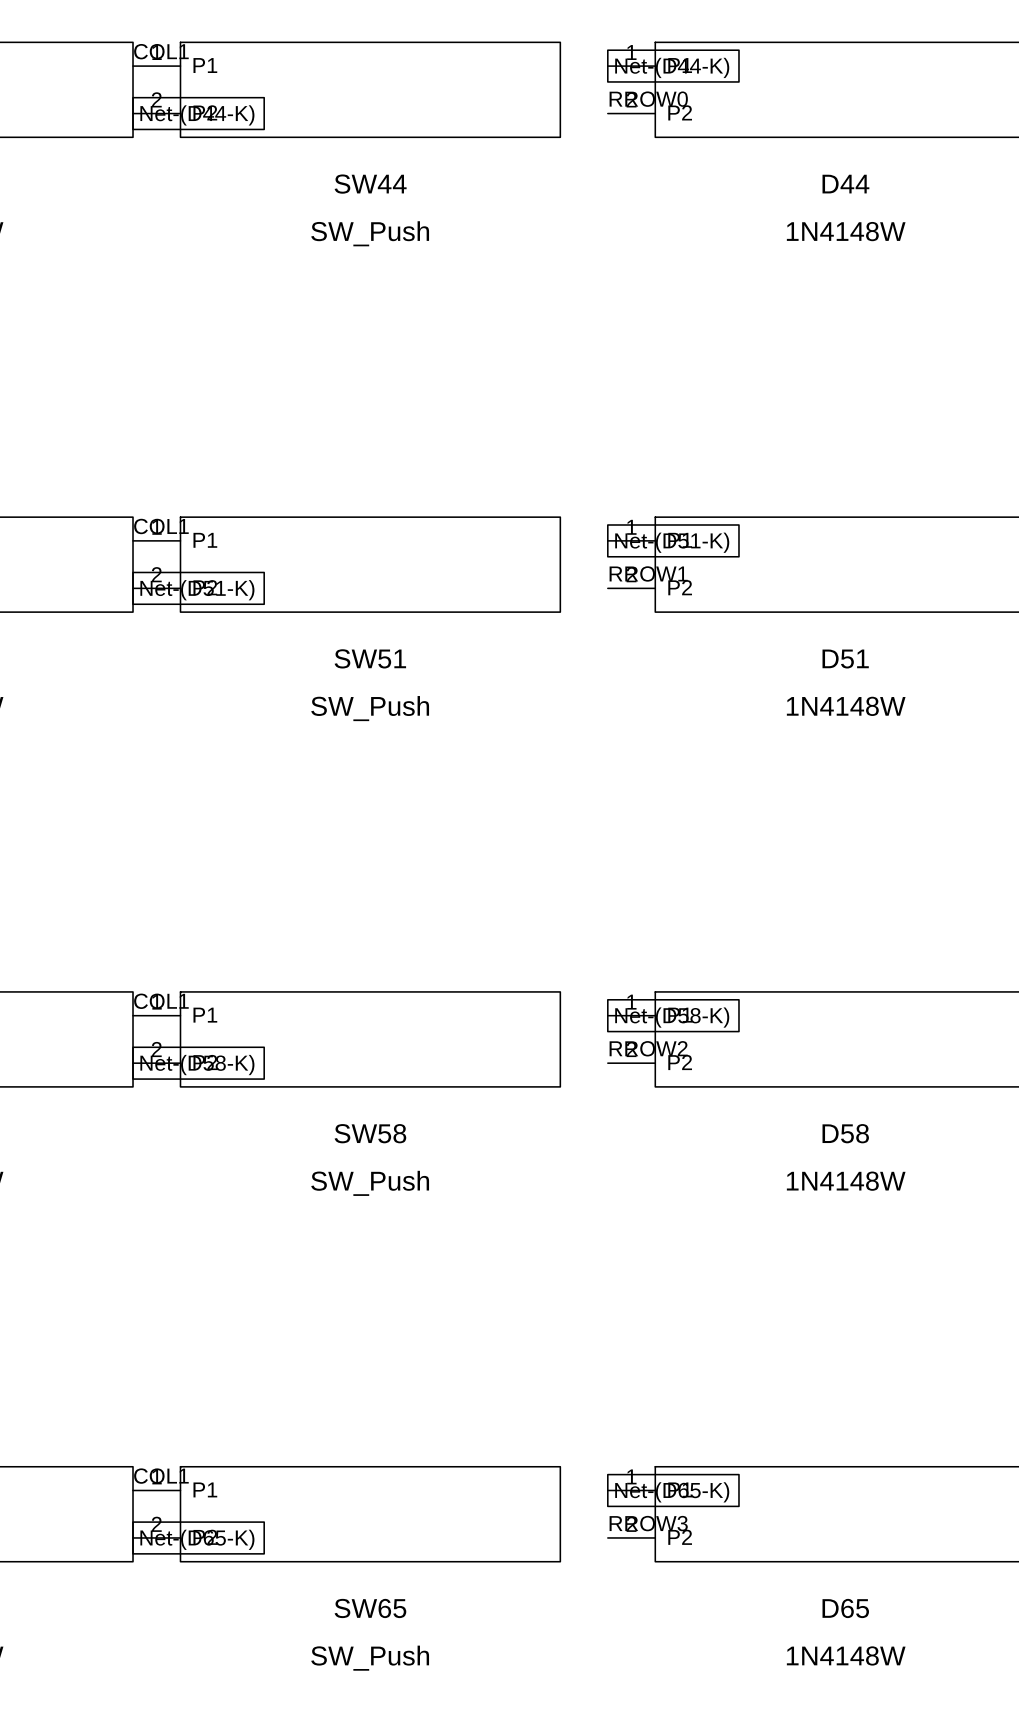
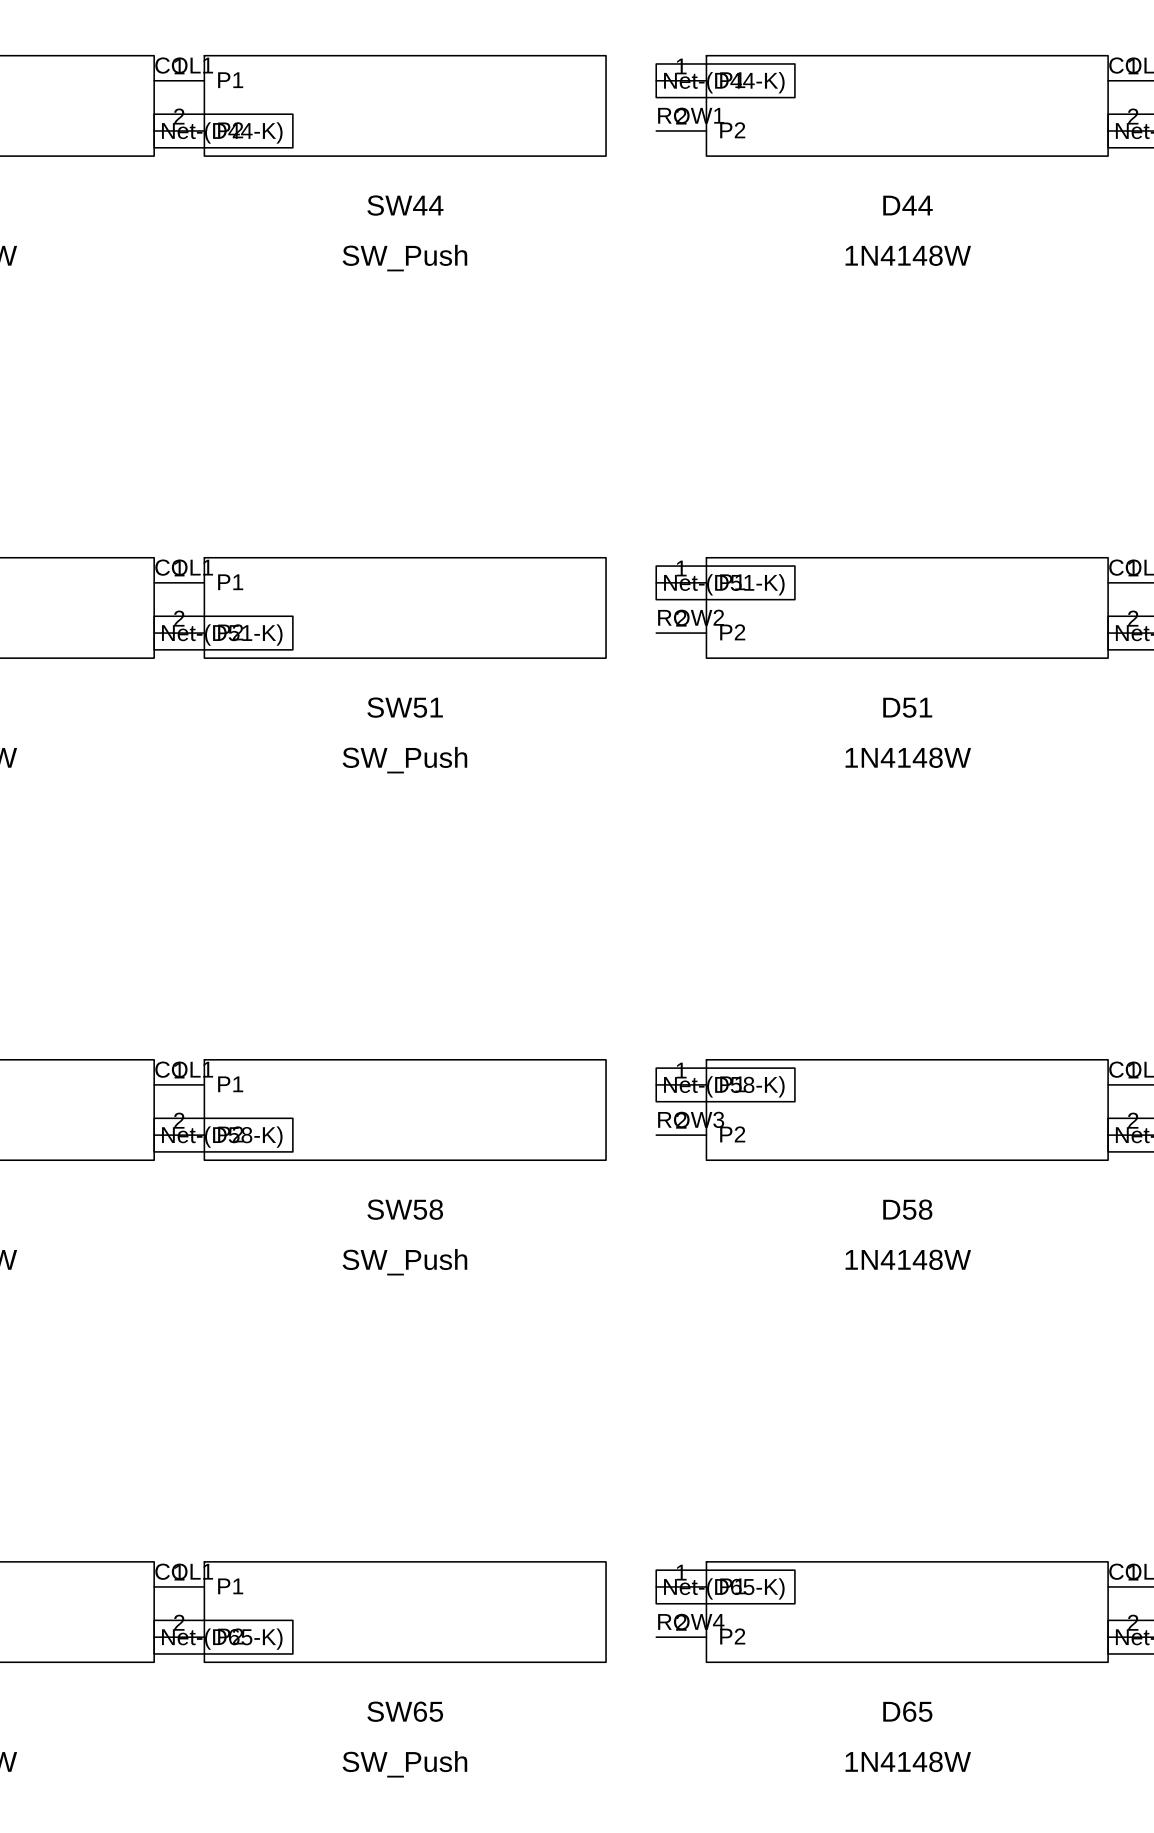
label: RROW0 (648, 99) -> ROW1 (691, 115)
label: RROW1 (648, 573) -> ROW2 (691, 617)
label: RROW2 (648, 1048) -> ROW3 (691, 1119)
label: RROW3 (648, 1523) -> ROW4 (691, 1621)

